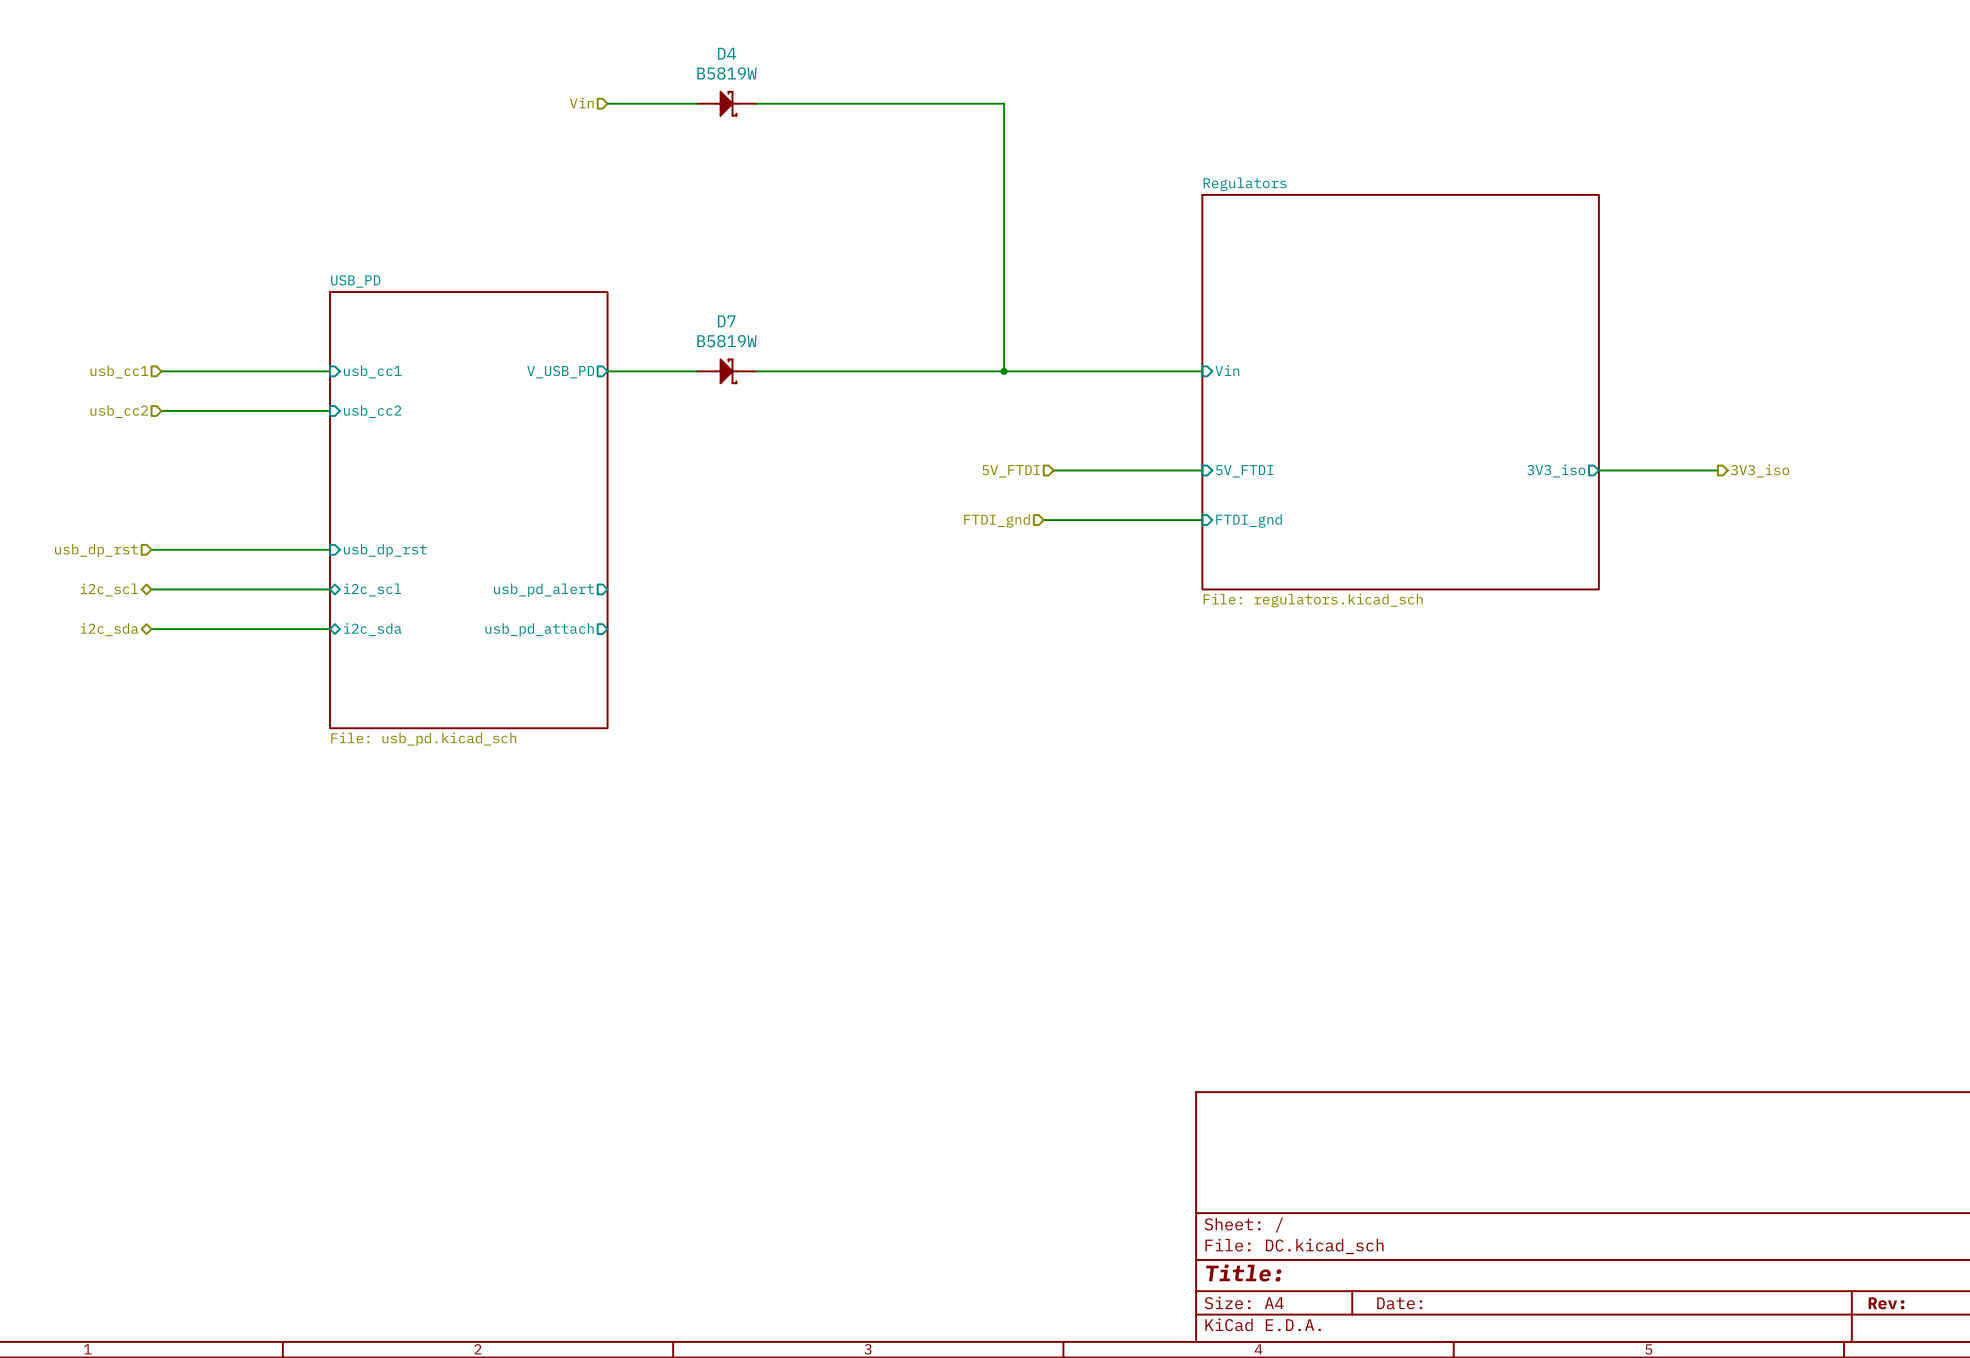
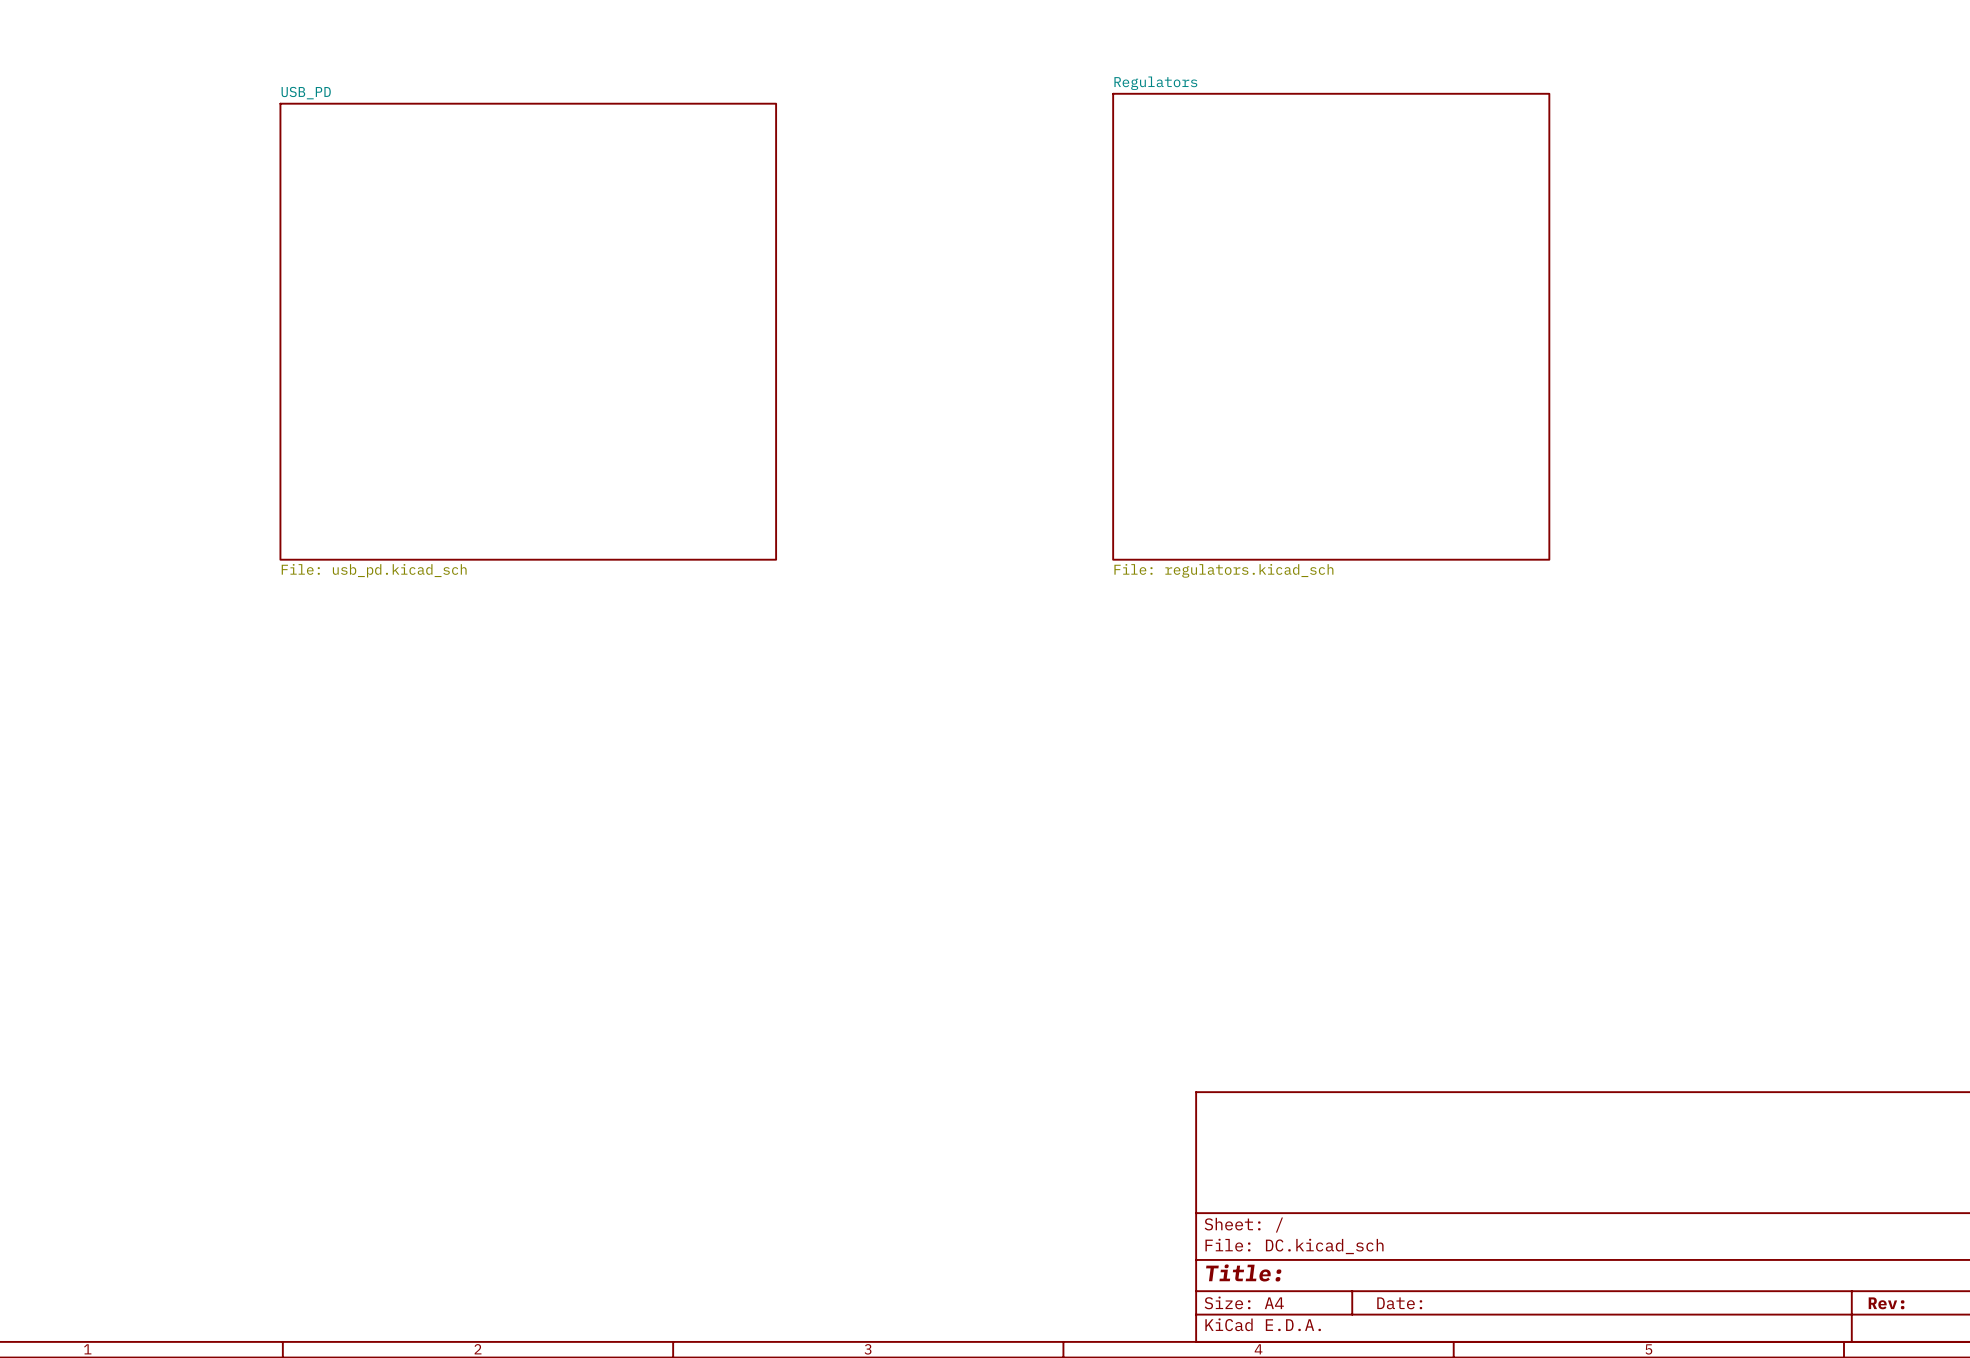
hierarchical label: Vin (581, 102) -> none
D4: B5819W (726, 103) -> none
wire: (756, 103) (1004, 103) (1004, 371) -> none
sheet Regulators: none -> File: regulators.kicad_sch (1331, 326)
sheet USB_PD: none -> File: usb_pd.kicad_sch (528, 331)
sheet pin: Vin (1227, 370) -> none
hierarchical label: usb_cc1 (119, 371) -> none
wire: (161, 371) (330, 371) -> none
sheet pin: usb_cc1 (372, 371) -> none
wire: (607, 371) (696, 371) -> none
D7: B5819W (726, 371) -> none
wire: (756, 371) (1202, 371) -> none
junction: (1004, 371) -> none
sheet pin: V_USB_PD (560, 372) -> none
sheet Regulators: File: regulators.kicad_sch (1400, 392) -> none
hierarchical label: usb_cc2 (119, 411) -> none
wire: (161, 411) (330, 411) -> none
sheet pin: usb_cc2 (372, 411) -> none
wire: (1053, 470) (1202, 470) -> none
sheet pin: 3V3_iso (1556, 470) -> none
wire: (1598, 470) (1717, 470) -> none
hierarchical label: 3V3_iso (1760, 470) -> none
hierarchical label: 5V_FTDI (1011, 471) -> none
sheet pin: 5V_FTDI (1244, 471) -> none
sheet USB_PD: File: usb_pd.kicad_sch (468, 510) -> none
hierarchical label: FTDI_gnd (997, 520) -> none
wire: (1043, 520) (1202, 520) -> none
sheet pin: FTDI_gnd (1249, 520) -> none
wire: (151, 549) (330, 549) -> none
hierarchical label: usb_dp_rst (96, 550) -> none
sheet pin: usb_dp_rst (385, 550) -> none
hierarchical label: i2c_scl (109, 589) -> none
wire: (151, 589) (330, 589) -> none
sheet pin: i2c_scl (372, 589) -> none
sheet pin: usb_pd_alert (543, 590) -> none
hierarchical label: i2c_sda (109, 629) -> none
wire: (151, 629) (330, 629) -> none
sheet pin: i2c_sda (372, 629) -> none
sheet pin: usb_pd_attach (539, 629) -> none

